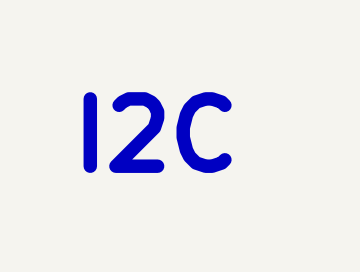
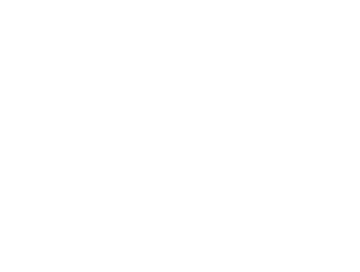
text: I2C (157, 132) -> none

